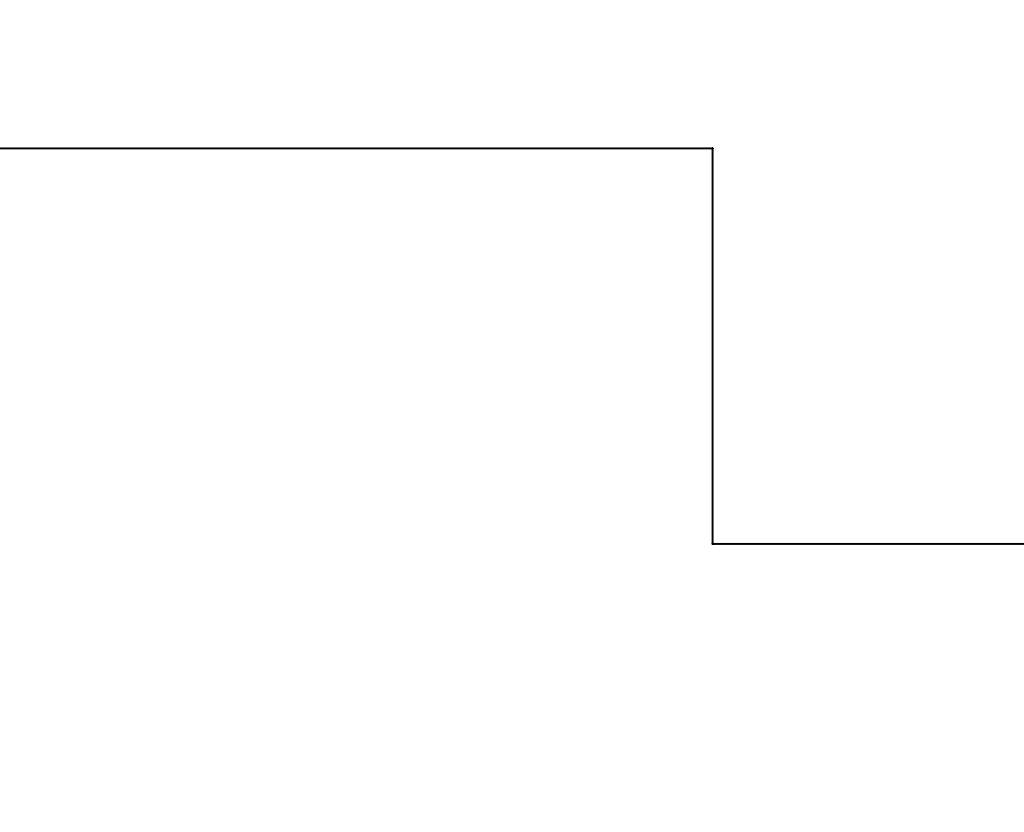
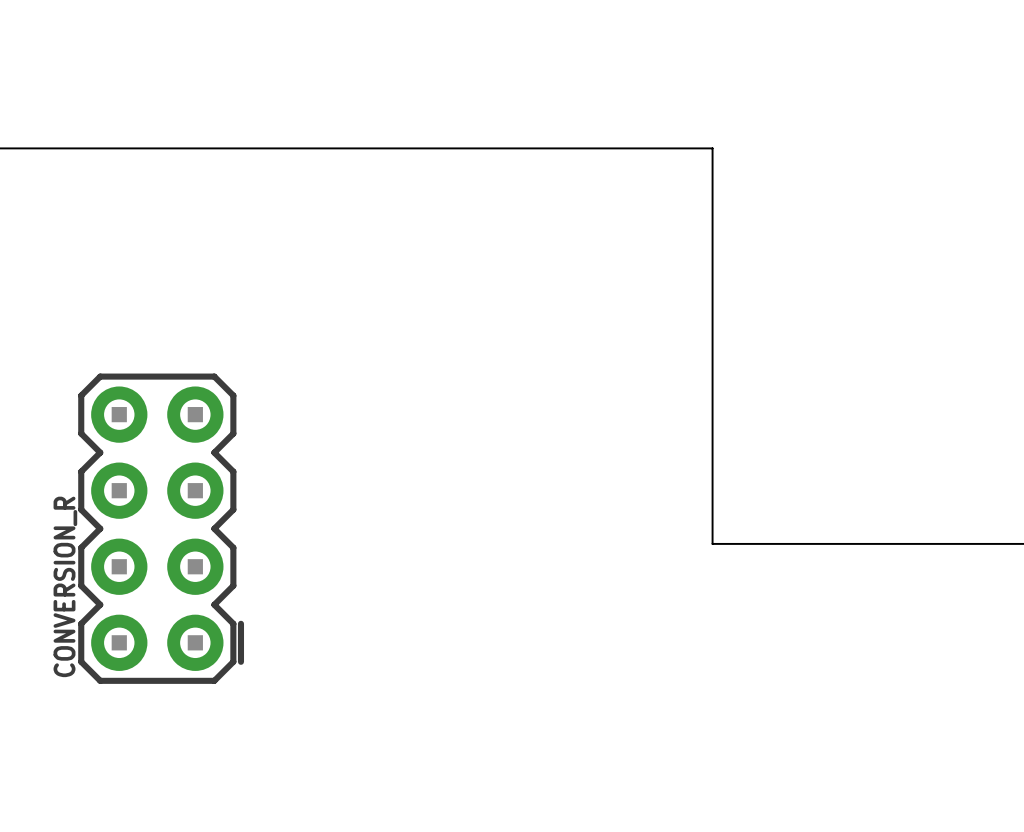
CONVERSION_R: none -> (161, 528)

